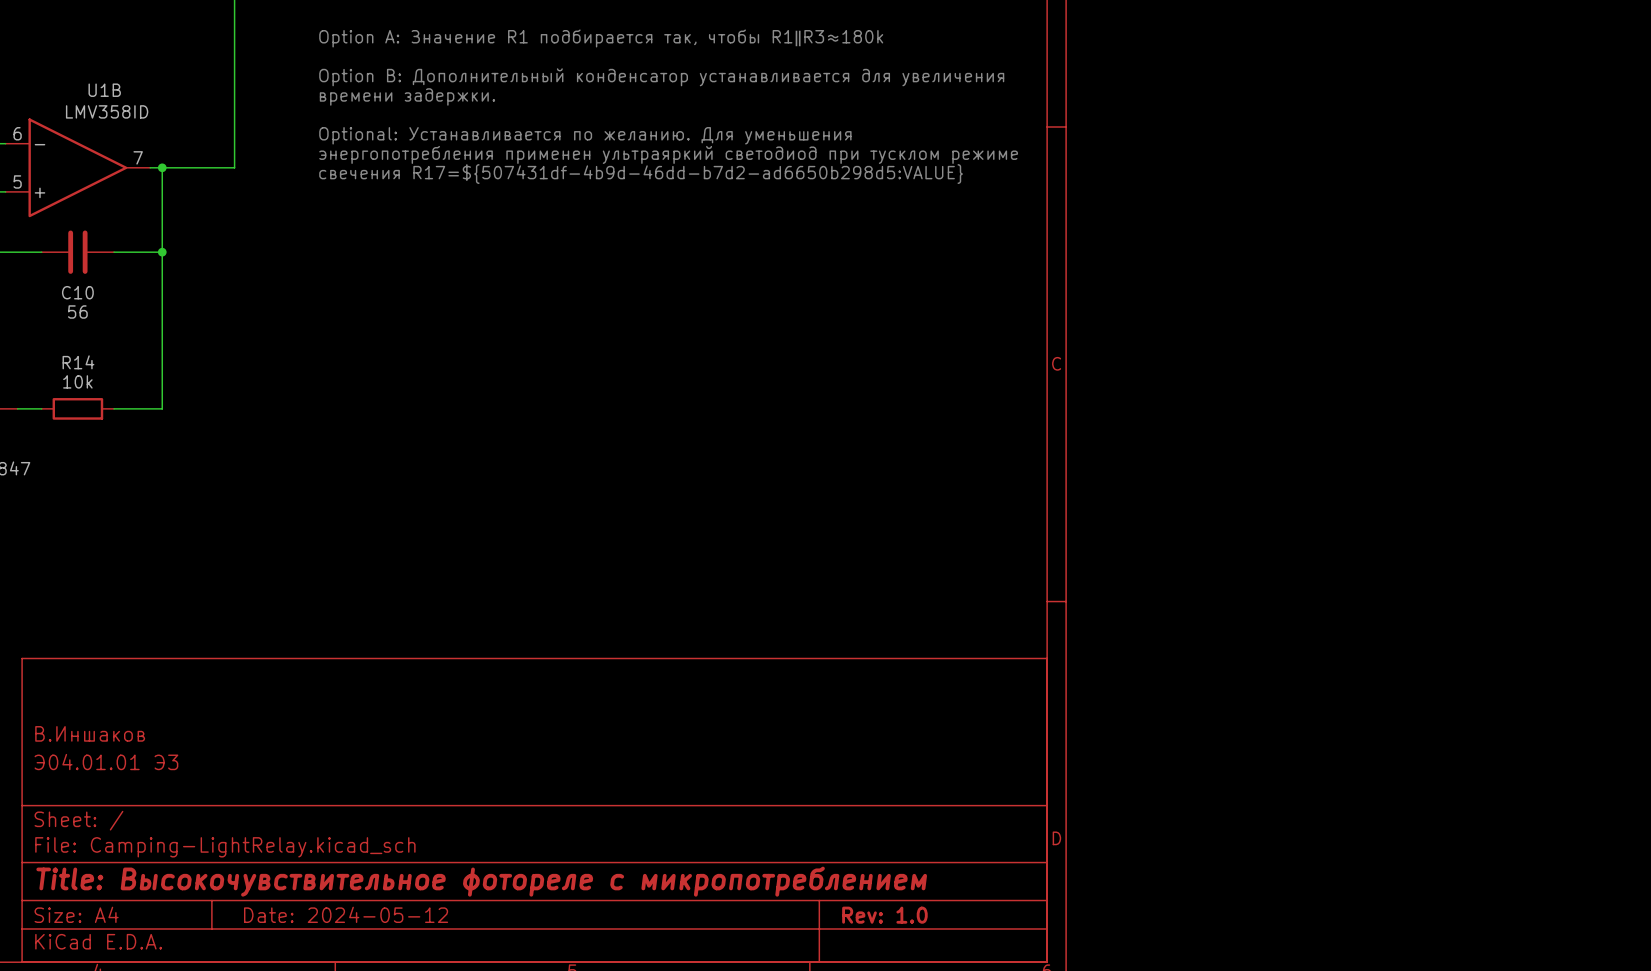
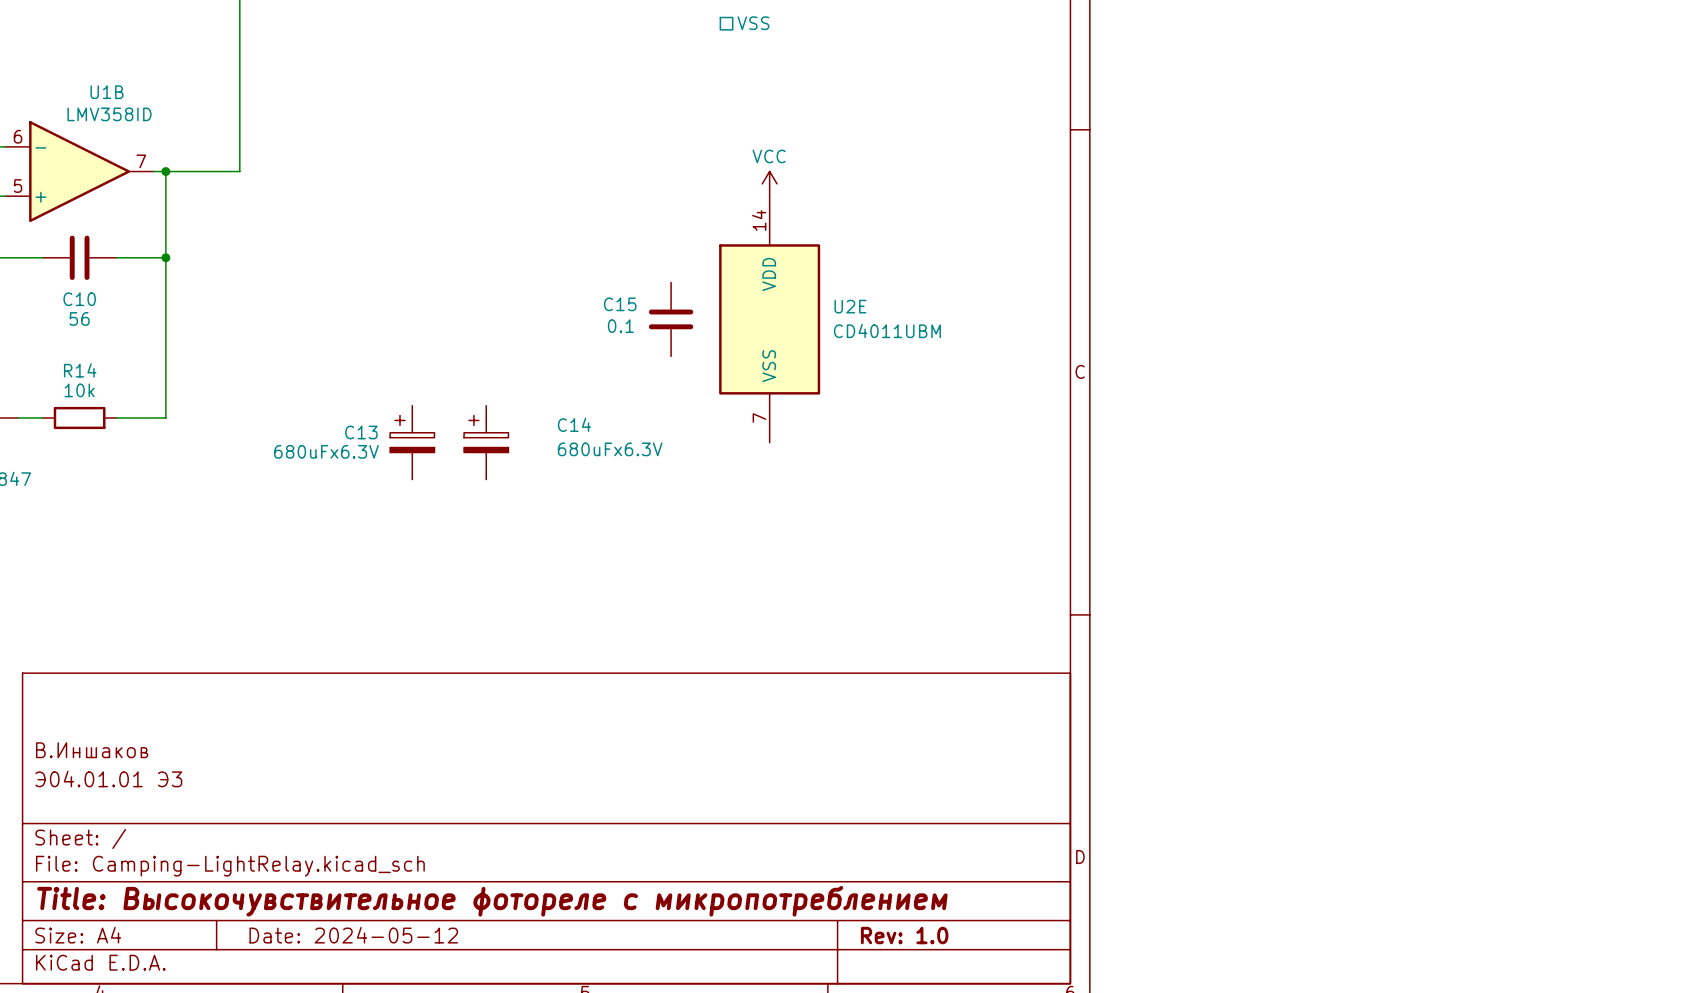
sheet pin: none -> VSS (753, 23)
text: Option A: Значение R1 подбирается так, чтобы R1ǁR3≈180k (601, 38) -> none
text: Option B: Дополнительный конденсатор устанавливается для увеличения (661, 77) -> none
text: времени задержки. (407, 96) -> none
text: Optional: Устанавливается по желанию. Для уменьшения (585, 135) -> none
text: энергопотребления применен ультраяркий светодиод при тусклом режиме (668, 154) -> none
text: свечения R17=${507431df-4b9d-46dd-b7d2-ad6650b298d5:VALUE} (641, 174) -> none
power symbol: none -> VCC (769, 183)
C15: none -> 0.1 (671, 319)
U2E: none -> CD4011UBM (769, 319)
C13: none -> 680uFx6.3V (412, 442)
C14: none -> 680uFx6.3V (486, 442)

